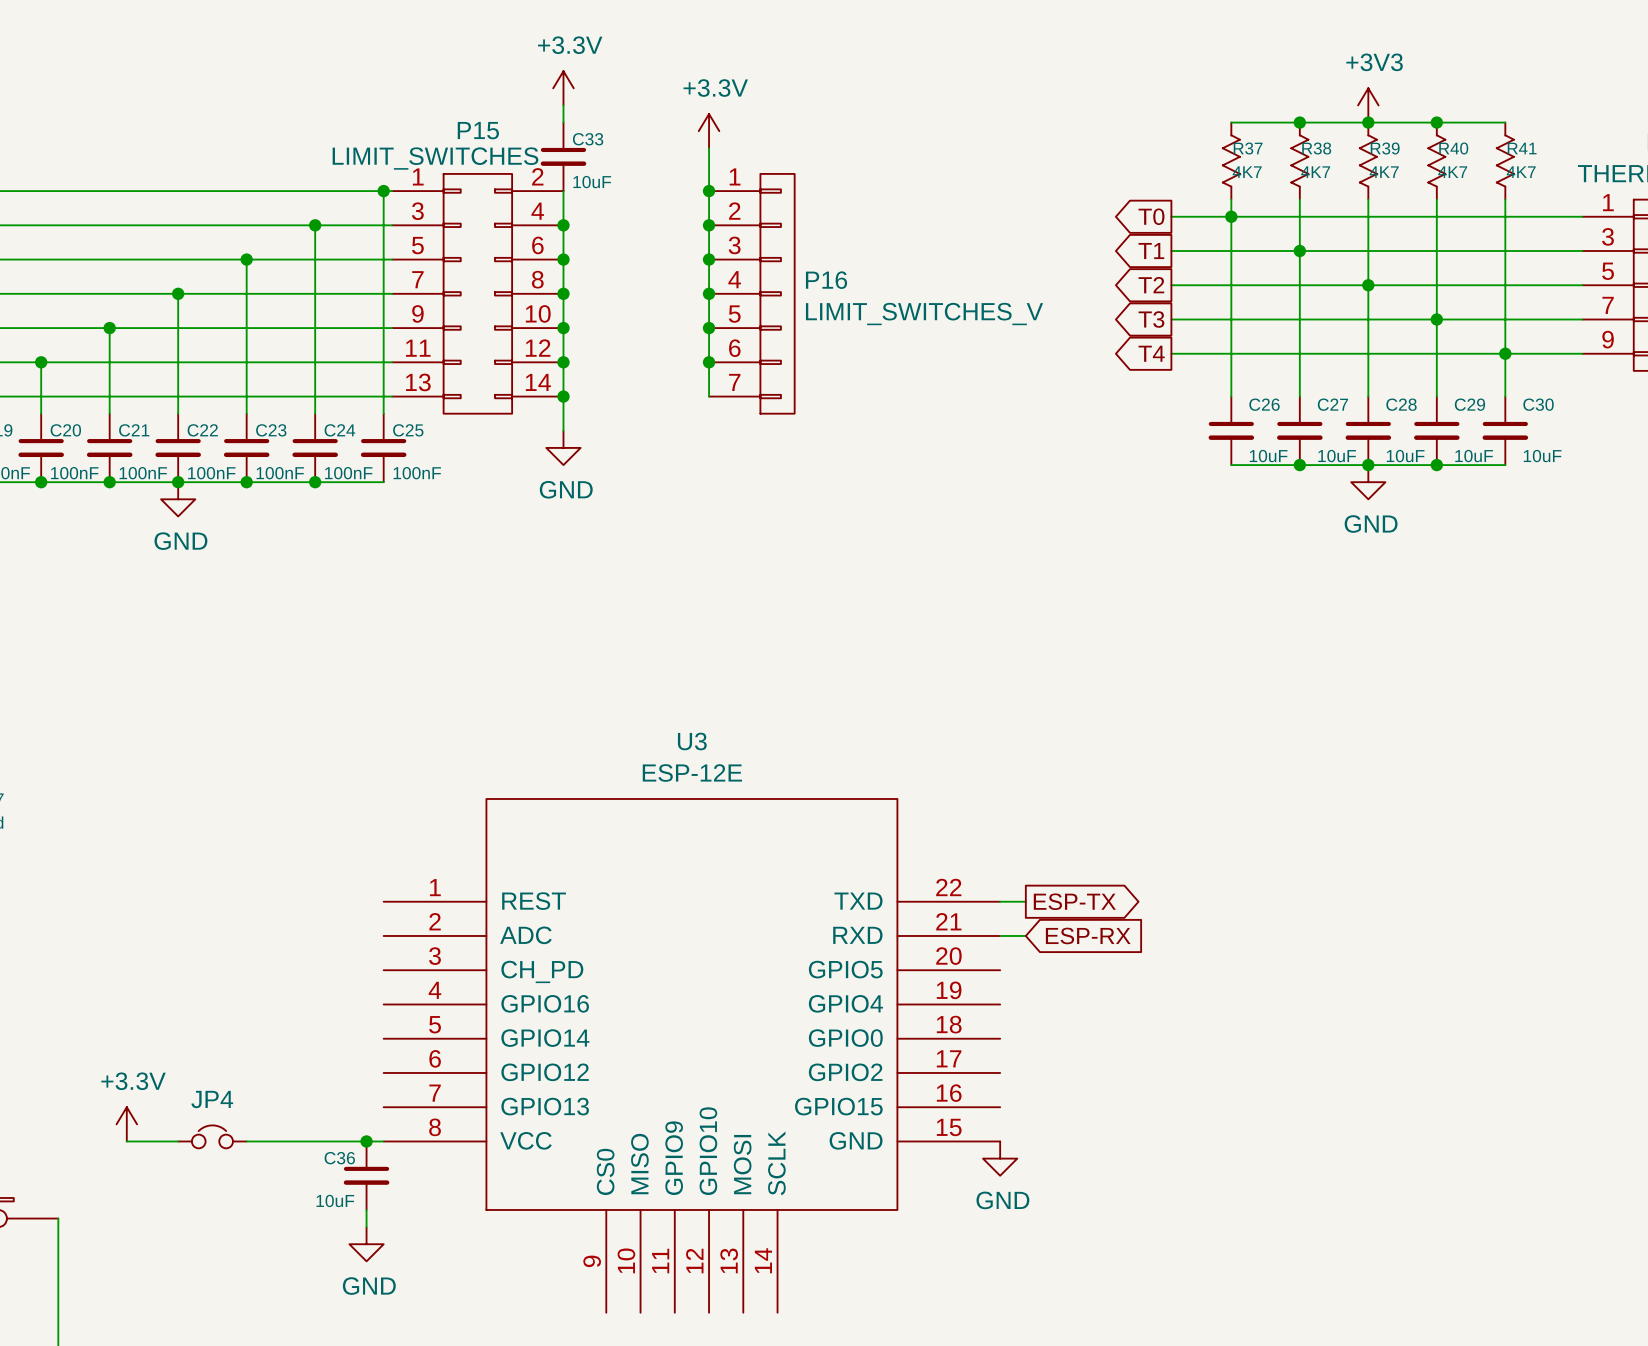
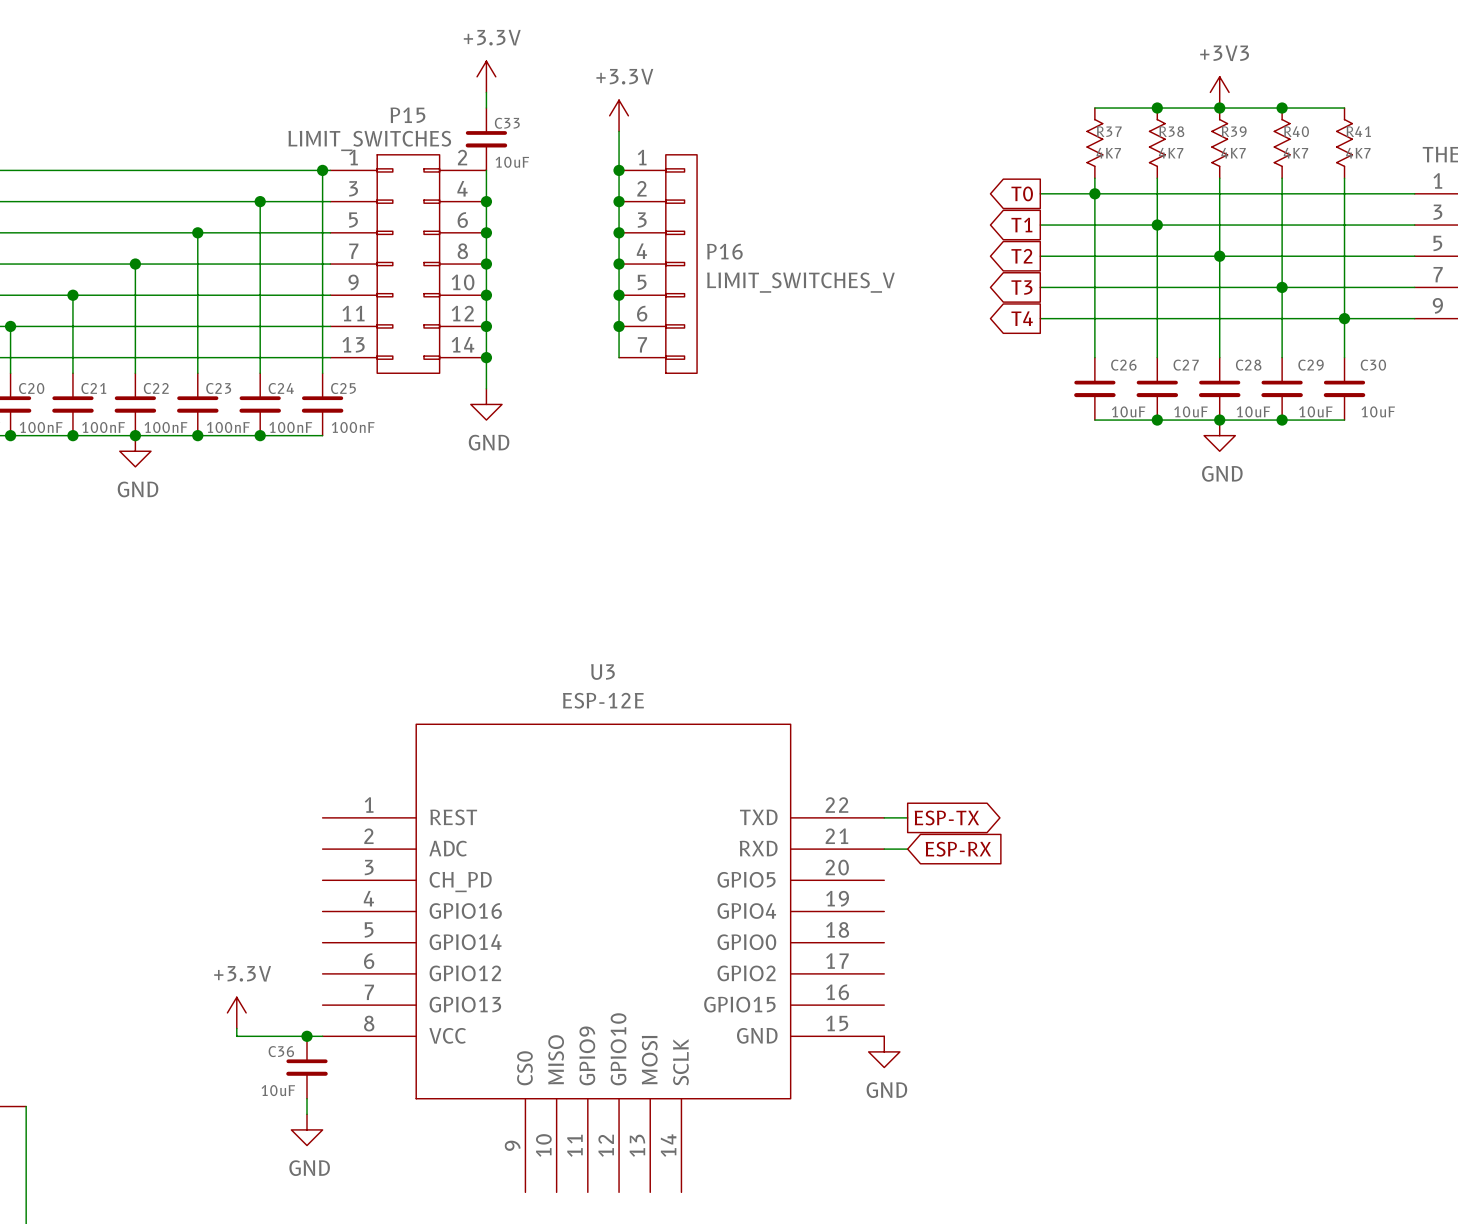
power symbol position: +3.3V (126, 1124) -> +3.3V (236, 1012)
JP4: (212, 1136) -> none
wire: (126, 1141) (178, 1141) -> none
wire: (246, 1141) (289, 1141) -> (236, 1028) (236, 1036)

